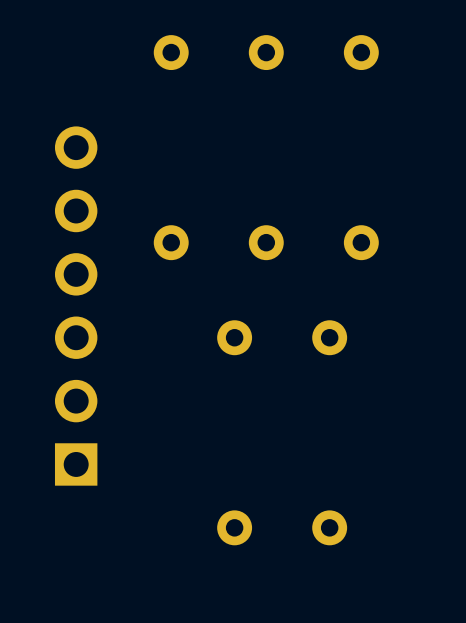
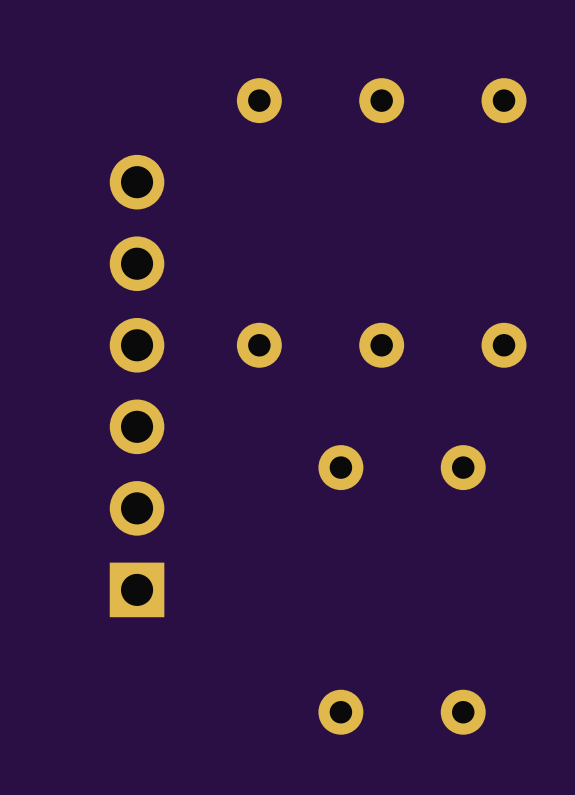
part position: (76, 306) -> (137, 386)

